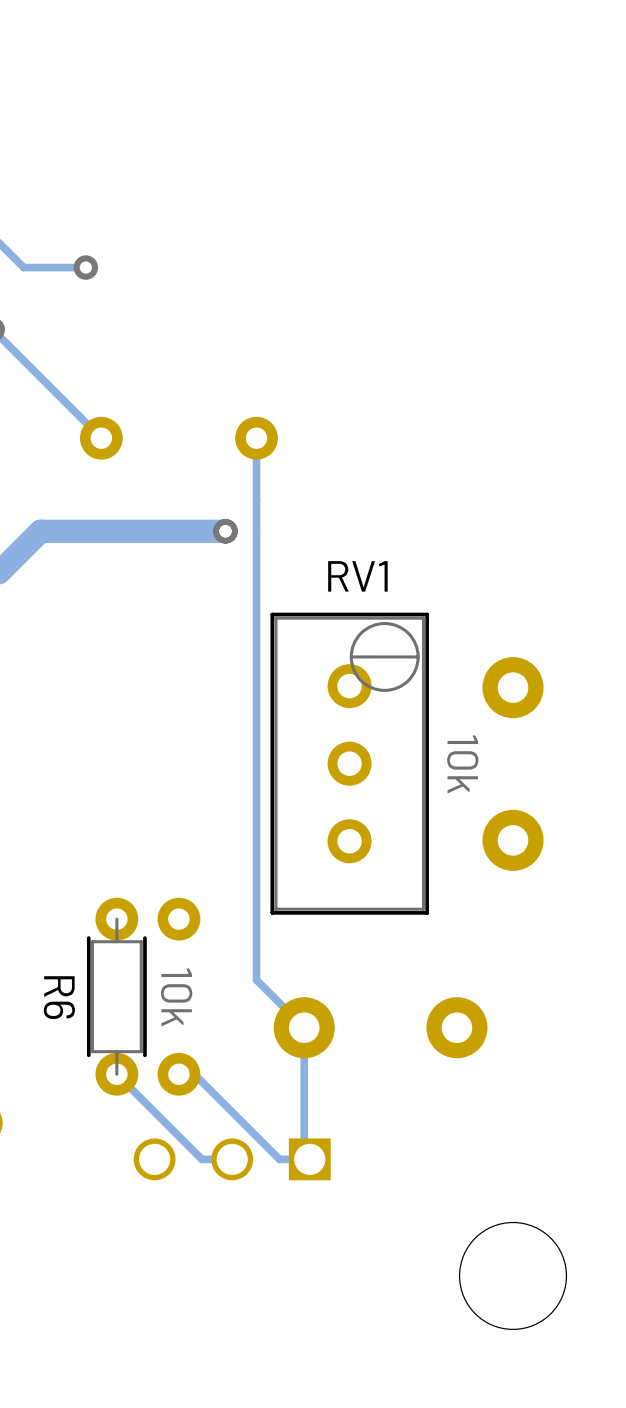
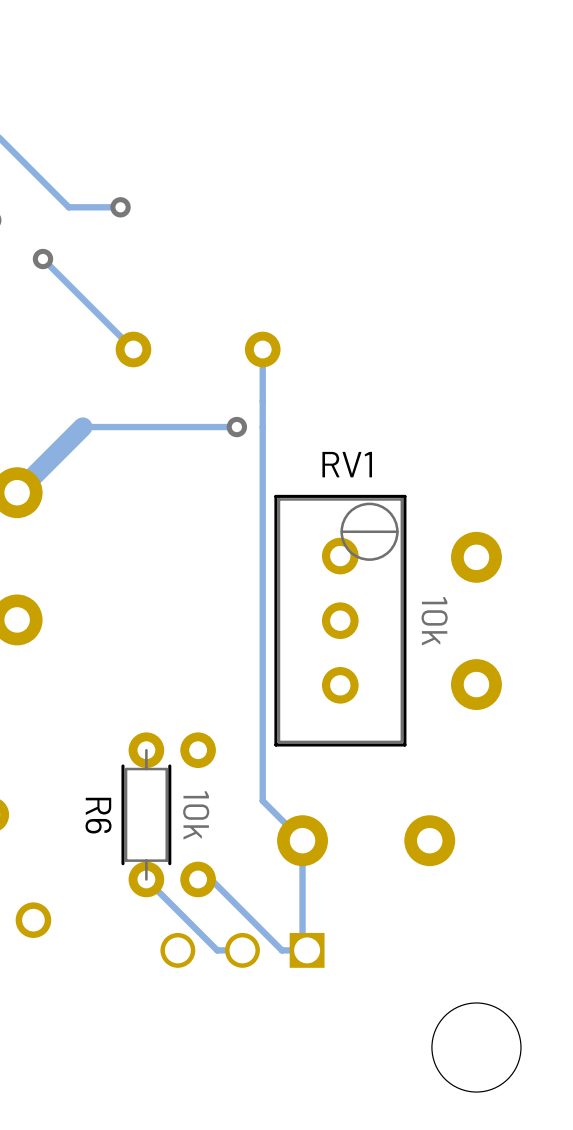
track width: thick (225, 531) (40, 531) -> thin (236, 427) (82, 427)

